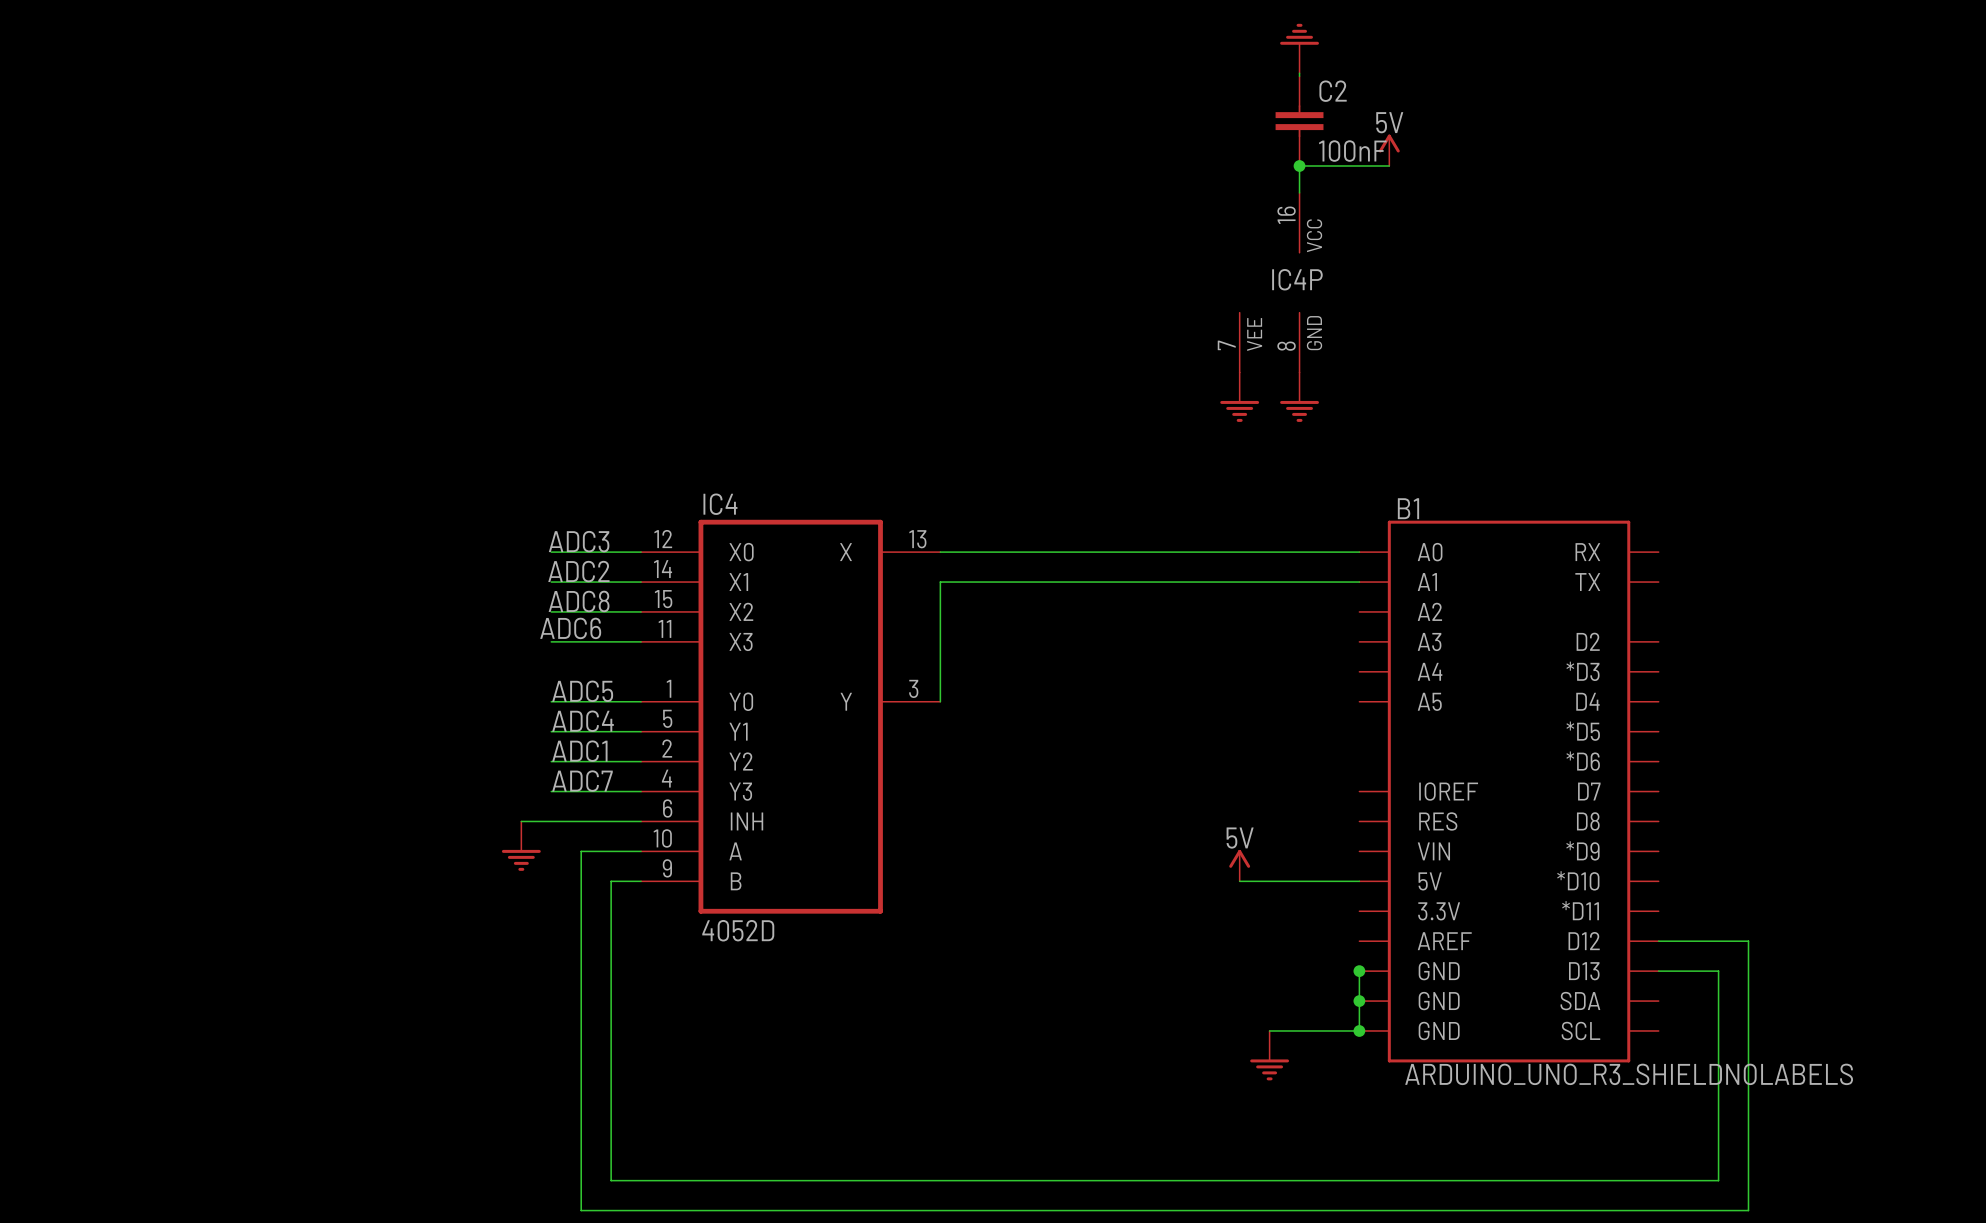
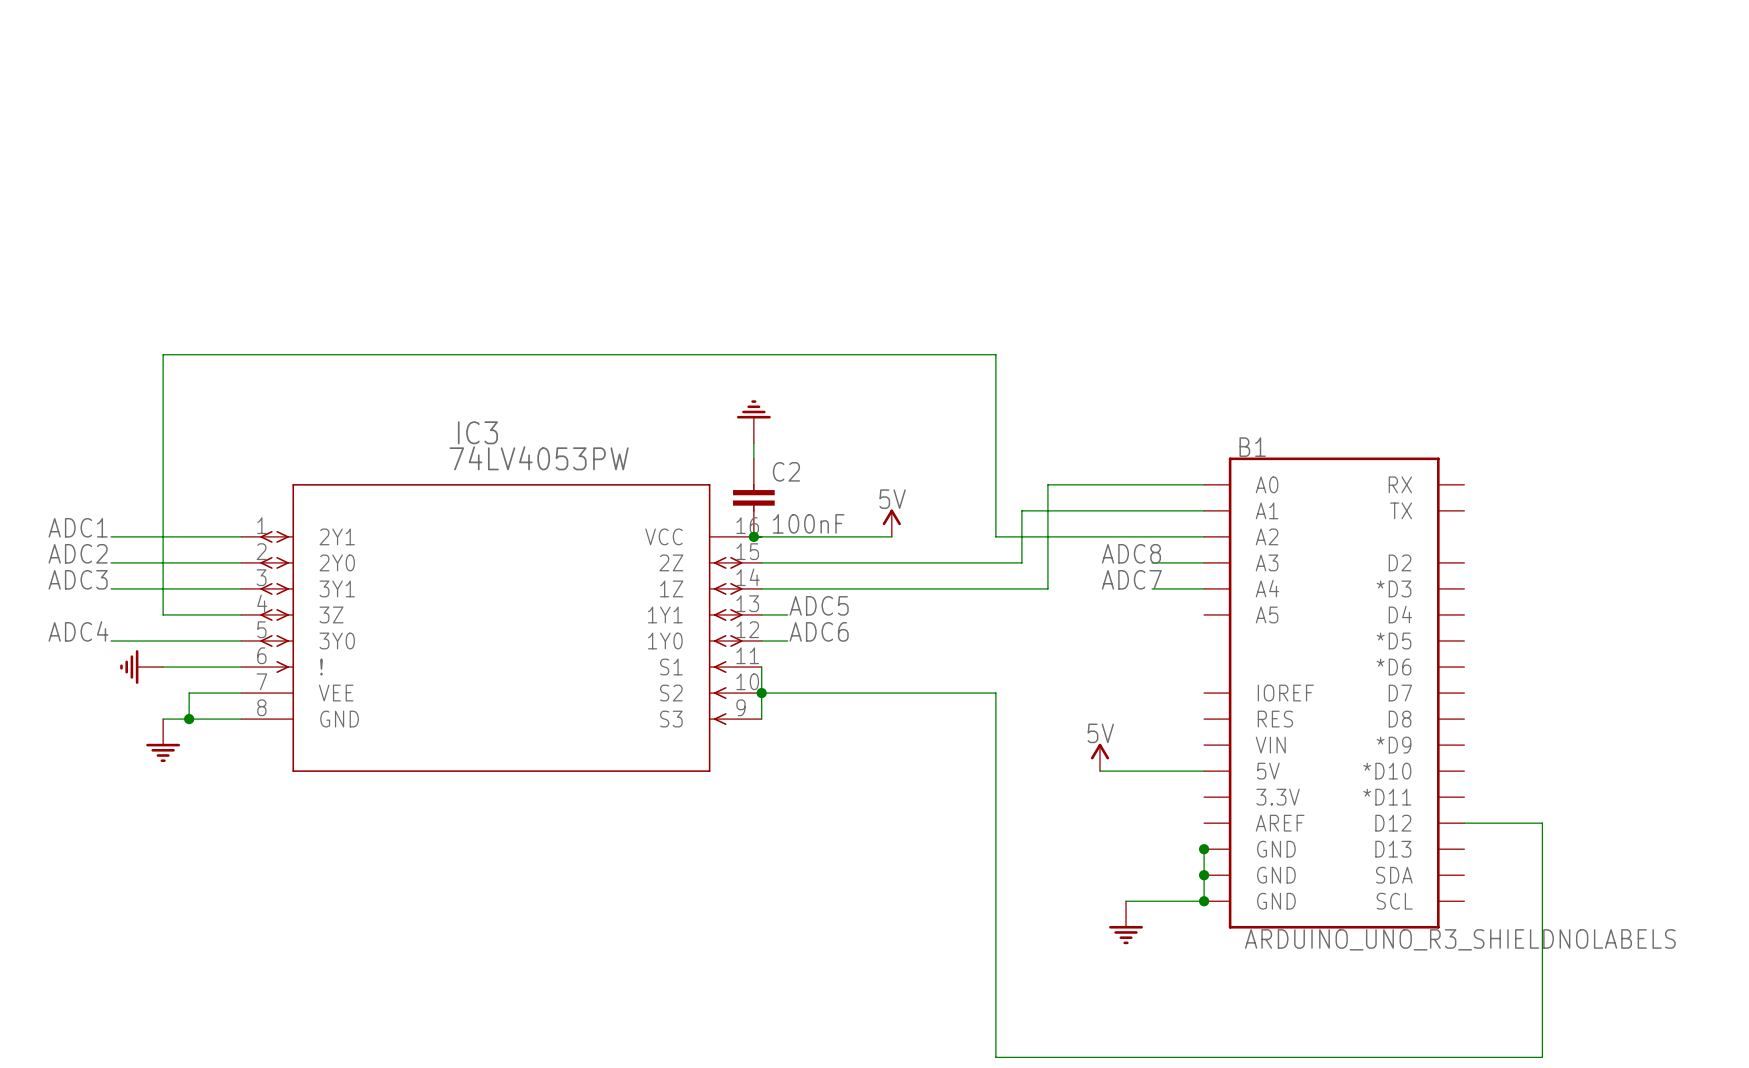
power symbol: (1299, 48) -> none
wire: (1299, 73) (1299, 76) -> none
C2 position: (1299, 121) -> (753, 497)
power symbol: 5V (1389, 150) -> none
junction: (1299, 165) -> none
wire: (1389, 165) (1299, 165) (1299, 192) -> none
IC4P: (1269, 282) -> none
power symbol: (1239, 397) -> none
power symbol: (1299, 397) -> none
power symbol: none -> (753, 421)
wire: none -> (753, 443) (753, 458)
label: ADC3 (579, 541) -> none
wire: (940, 552) (1179, 552) -> (761, 588) (1047, 588) (1047, 484)
label: ADC2 (578, 571) -> none
wire: (551, 582) (641, 582) -> none
wire: (1149, 582) (940, 582) (940, 701) -> (1021, 510) (1021, 562) (761, 562)
power symbol: none -> 5V (891, 523)
label: none -> ADC1 (78, 527)
label: ADC8 (579, 601) -> none
wire: none -> (111, 536) (241, 536)
wire: (551, 611) (641, 611) -> none
wire: none -> (753, 536) (891, 536)
junction: none -> (753, 536)
wire: none -> (1204, 536) (995, 536) (995, 354) (163, 354) (163, 614) (241, 614)
label: ADC6 (570, 628) -> none
label: none -> ADC2 (78, 553)
label: none -> ADC8 (1131, 553)
wire: none -> (111, 562) (241, 562)
wire: (551, 641) (641, 641) -> none
wire: none -> (1152, 562) (1204, 562)
label: none -> ADC3 (78, 579)
label: none -> ADC7 (1131, 579)
wire: none -> (111, 588) (241, 588)
wire: none -> (1152, 588) (1204, 588)
label: ADC5 (582, 691) -> none
label: none -> ADC5 (819, 605)
wire: (551, 701) (641, 701) -> none
wire: none -> (761, 614) (787, 614)
IC3: none -> 74LV4053PW (501, 627)
IC4: 4052D (790, 716) -> none
label: none -> ADC4 (78, 631)
label: ADC4 (582, 721) -> none
label: none -> ADC6 (819, 631)
wire: none -> (111, 641) (241, 641)
wire: (551, 731) (641, 731) -> none
wire: none -> (761, 641) (787, 641)
label: ADC1 (579, 751) -> none
power symbol: none -> (141, 667)
wire: none -> (163, 667) (241, 667)
wire: (551, 761) (641, 761) -> none
wire: none -> (761, 667) (761, 719)
label: ADC7 (582, 781) -> none
wire: none -> (241, 693) (189, 693) (189, 719)
wire: (551, 791) (641, 791) -> none
junction: none -> (761, 693)
wire: none -> (163, 719) (241, 719)
junction: none -> (189, 719)
wire: (521, 821) (641, 821) -> none
power symbol: none -> (163, 740)
power symbol: (521, 846) -> none
wire: (641, 851) (581, 851) (581, 1210) (1119, 1210) -> (761, 693) (995, 693) (995, 1057)
wire: (641, 881) (611, 881) (611, 1180) (1718, 1180) (1718, 971) (1658, 971) -> none

